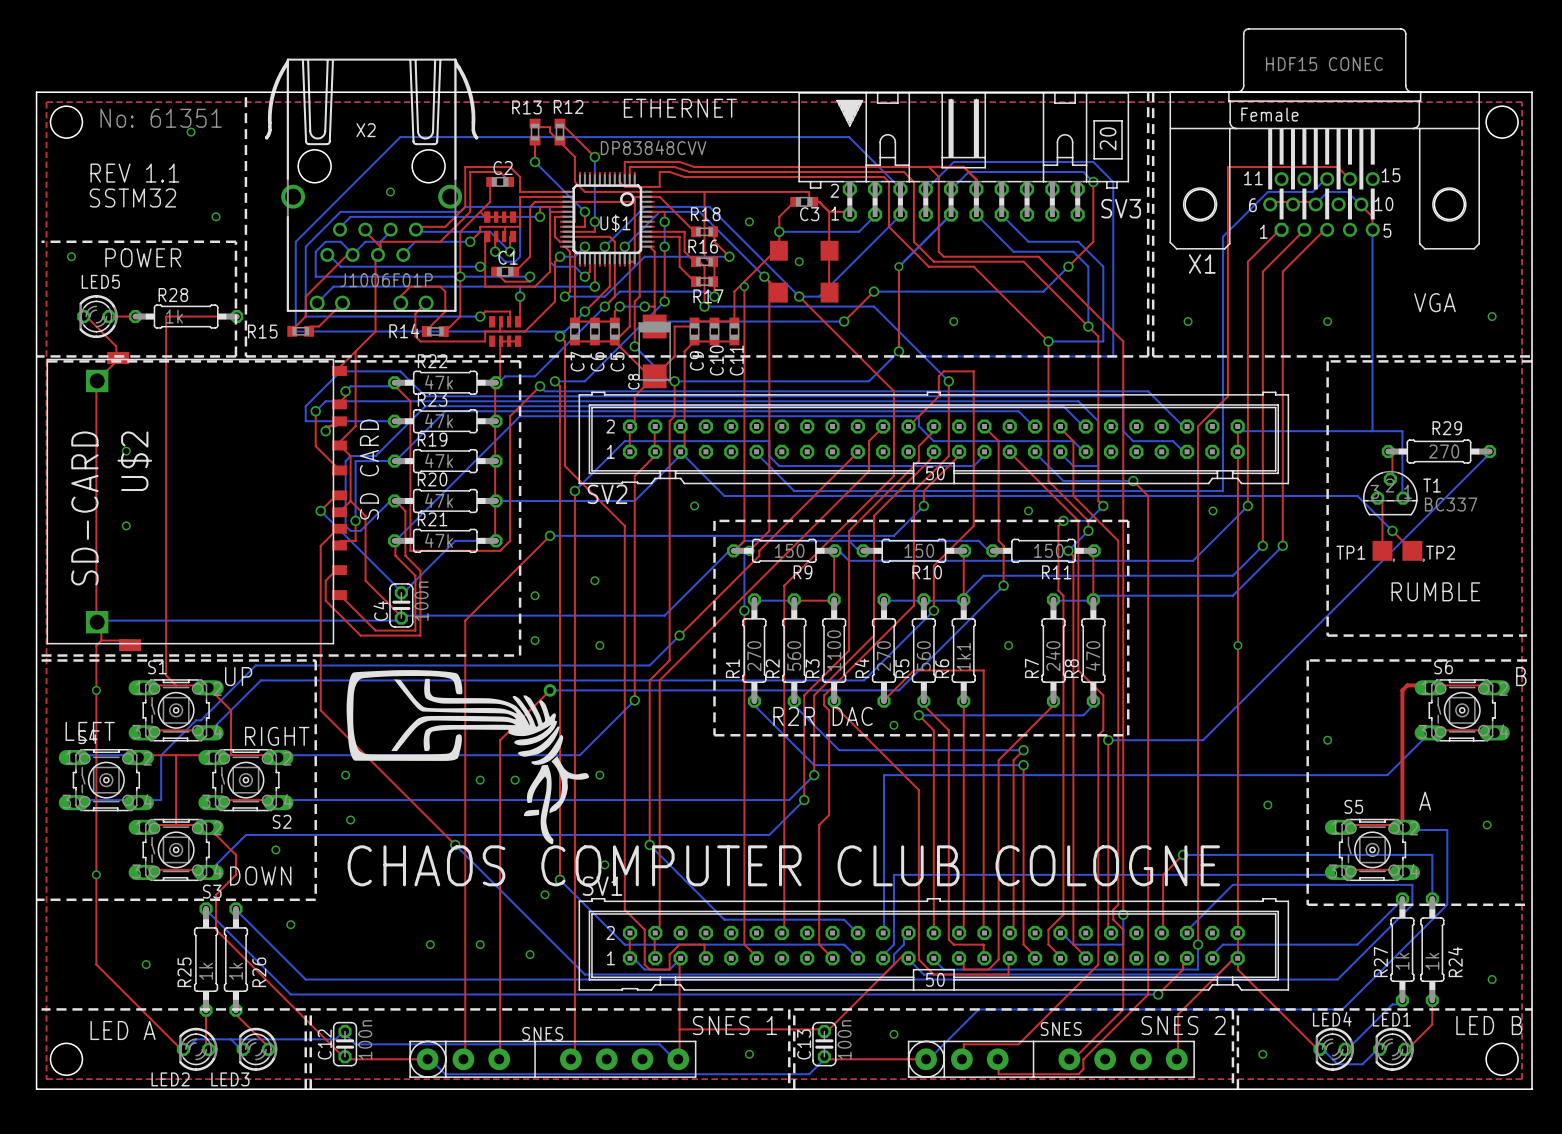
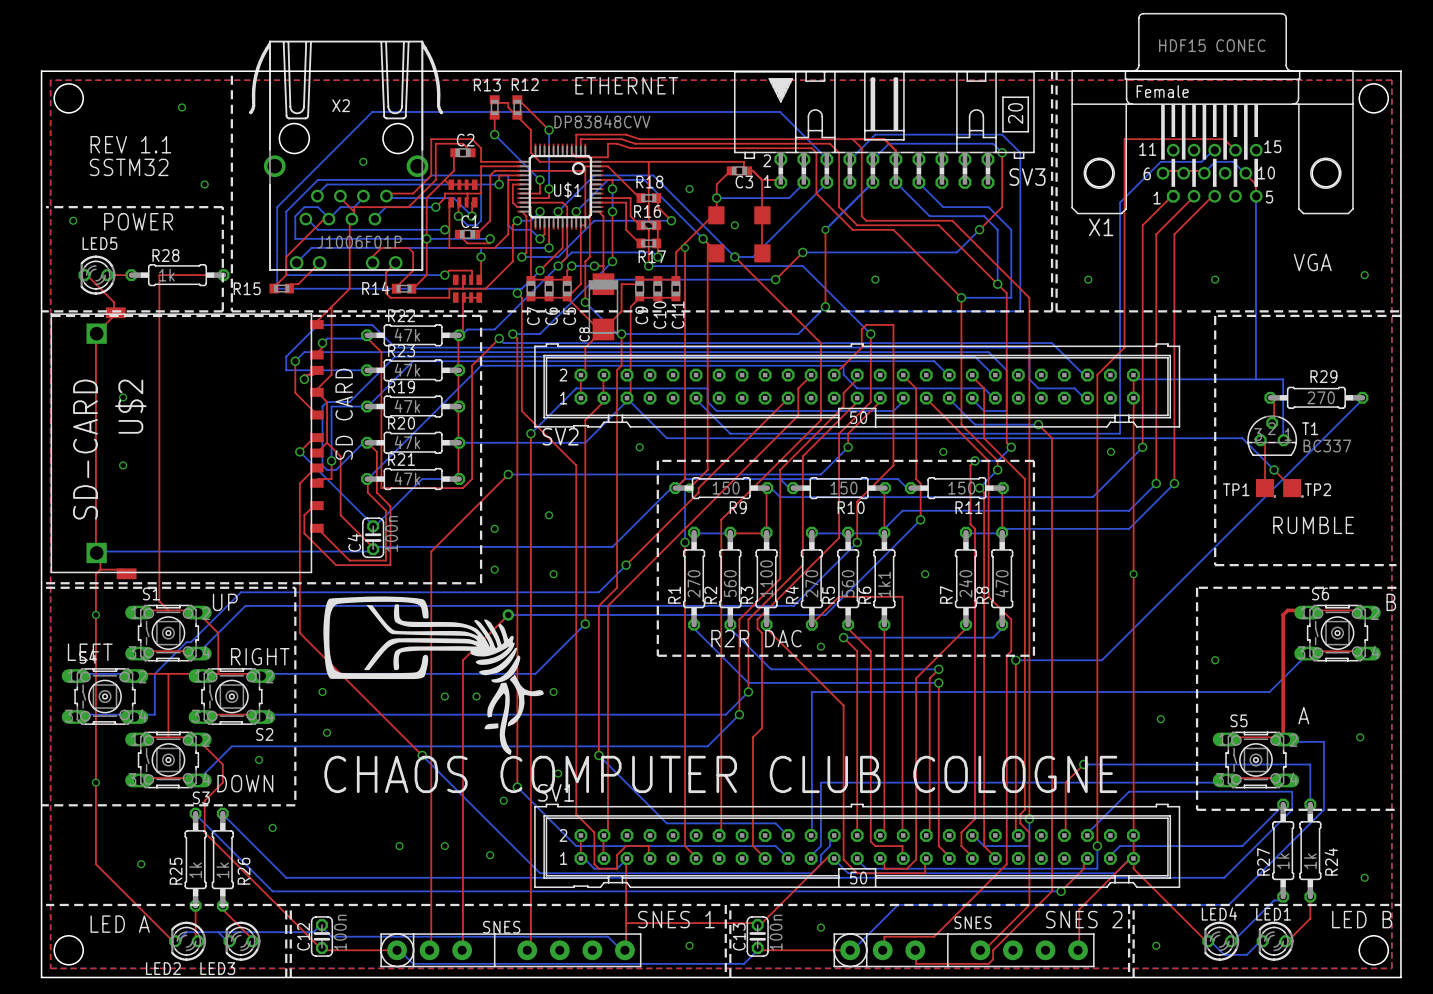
text: No: 61351 (161, 118) -> none

